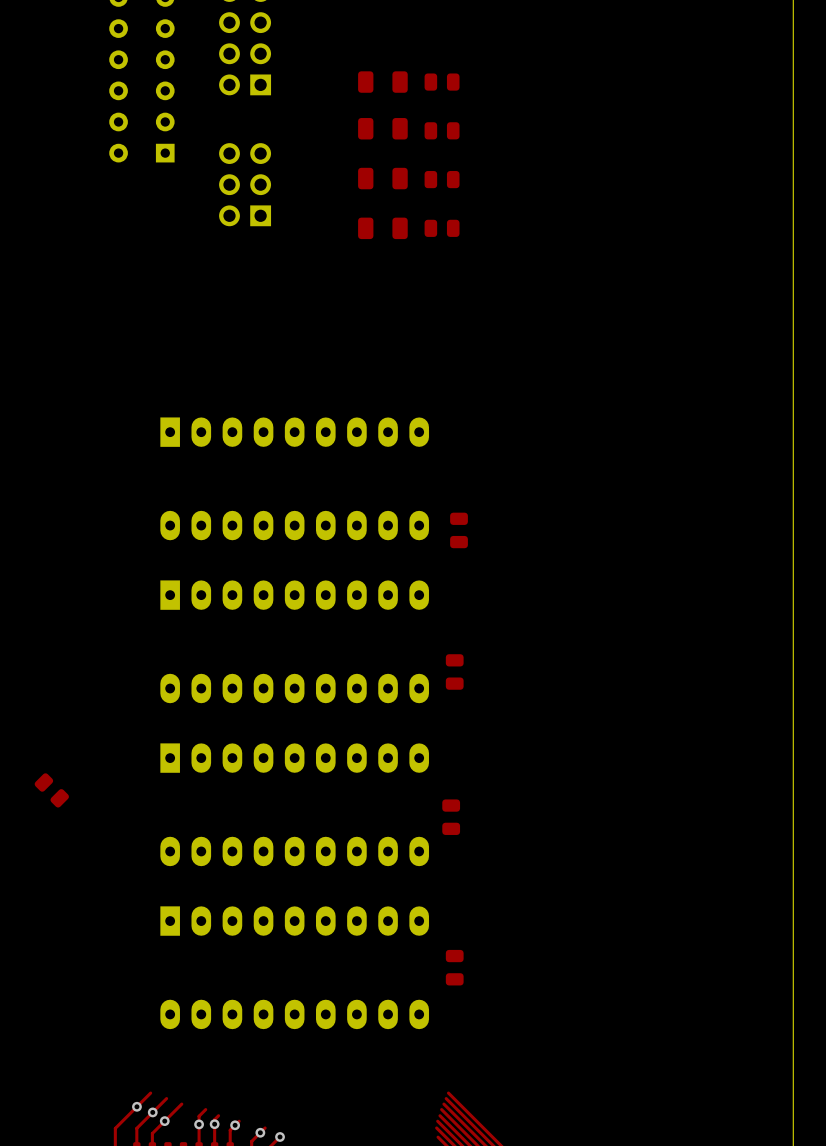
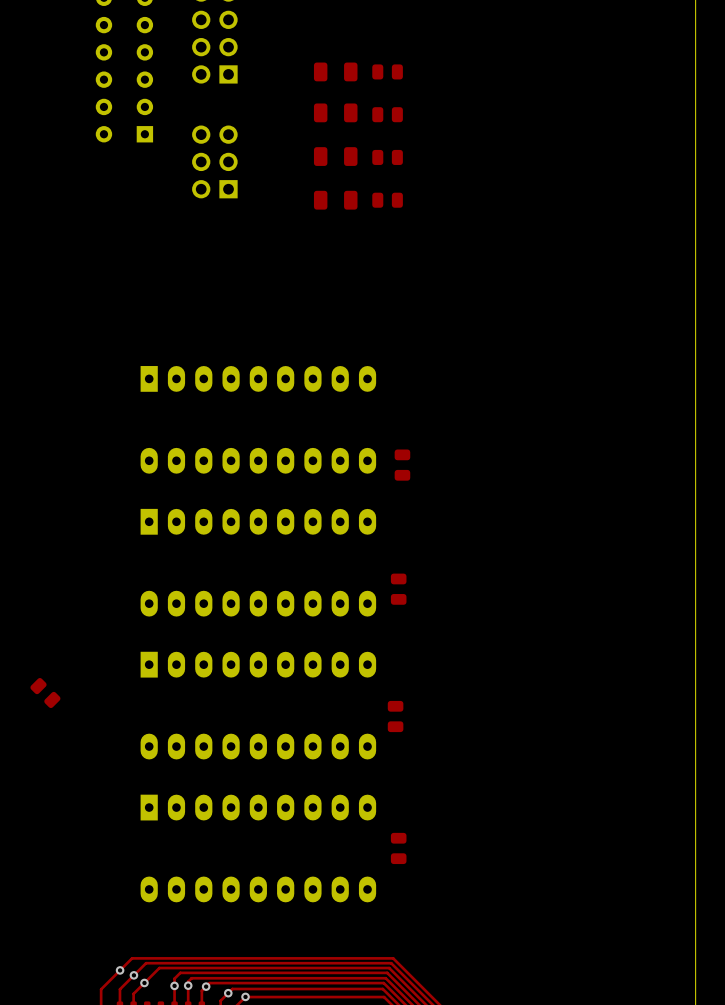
top track: none -> (393, 958) (132, 958)
top track: none -> (391, 963) (146, 963)
top track: none -> (389, 968) (159, 968)
top track: none -> (387, 972) (180, 972)
top track: none -> (385, 978) (191, 978)
top track: none -> (383, 983) (209, 983)
top track: none -> (382, 988) (232, 988)
top track: none -> (384, 997) (245, 997)

